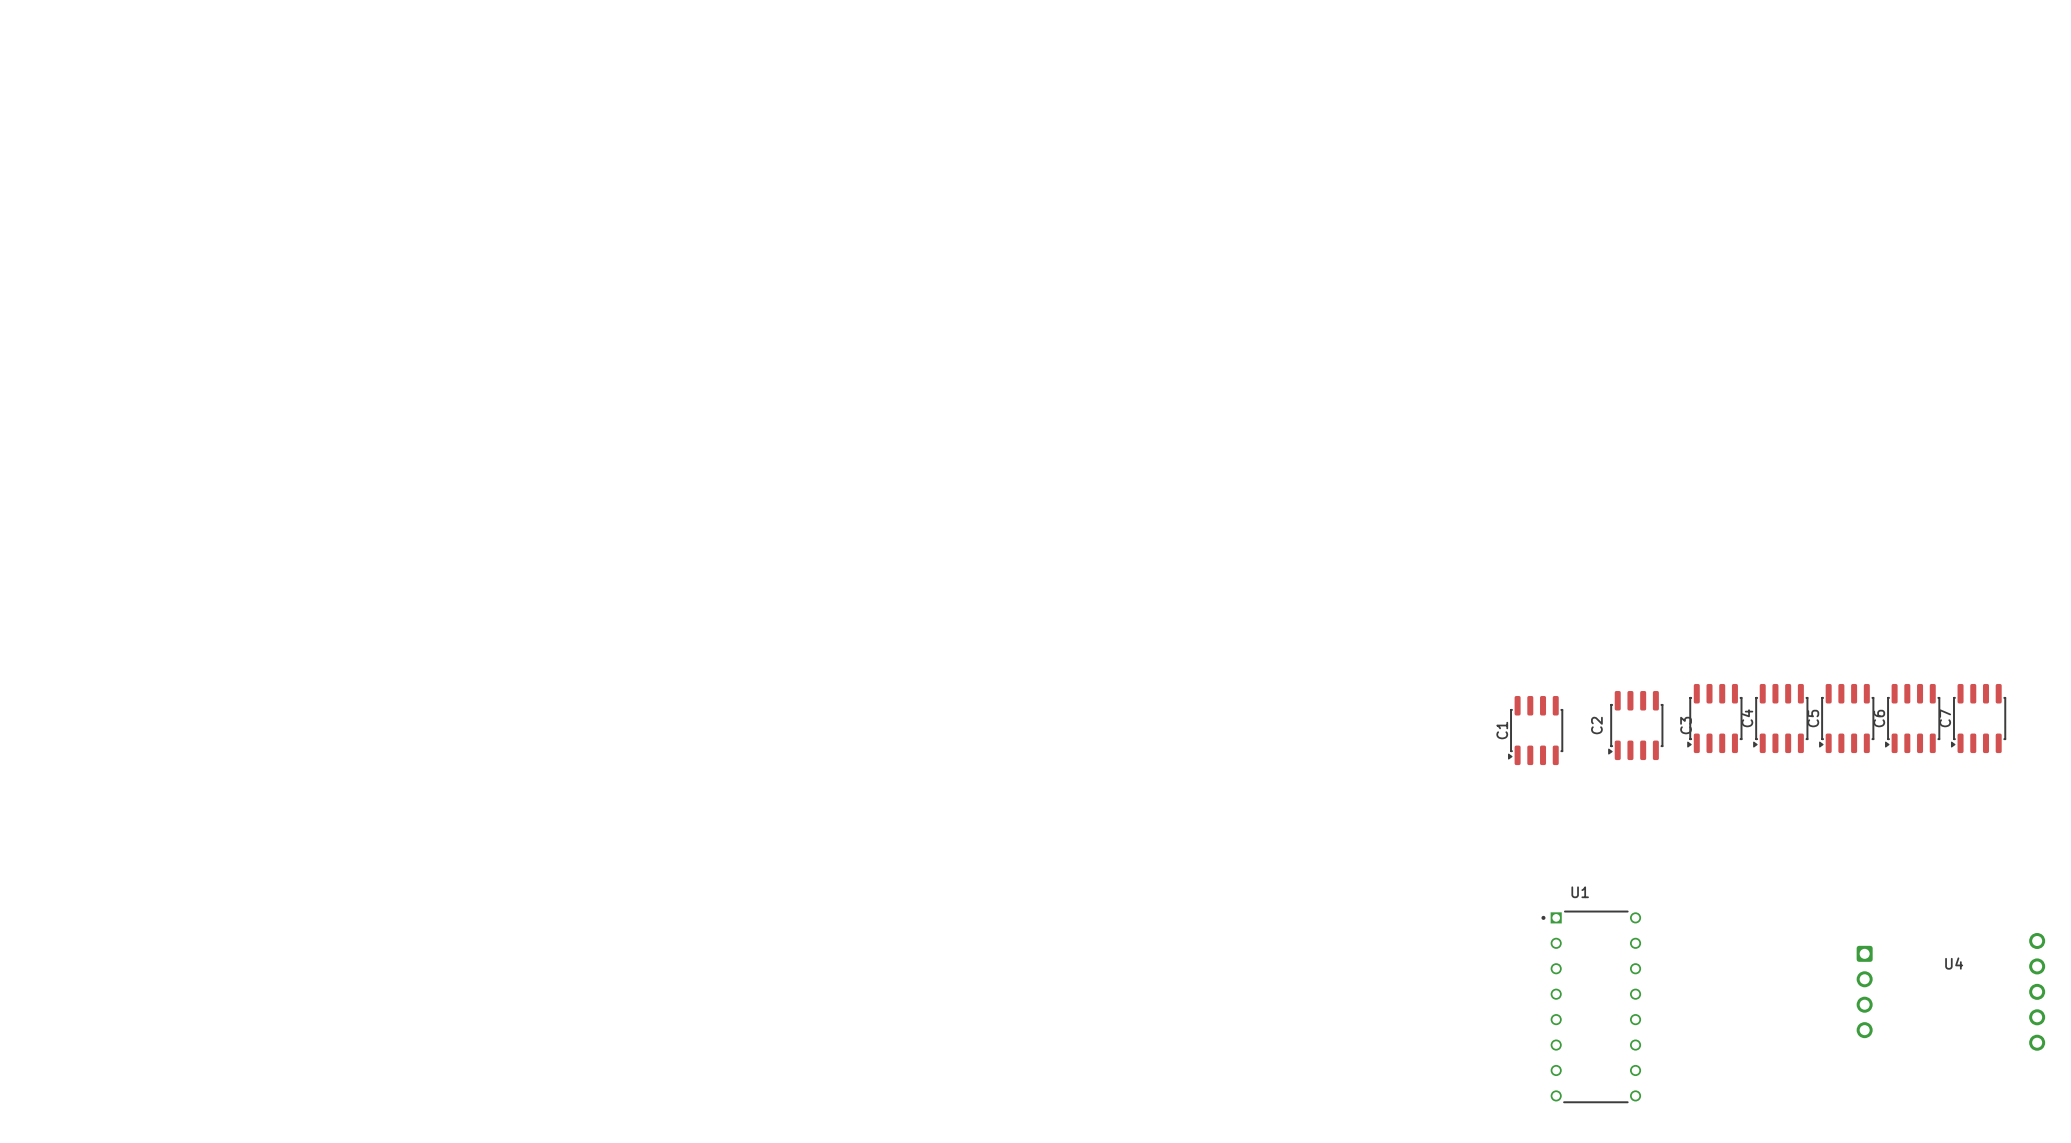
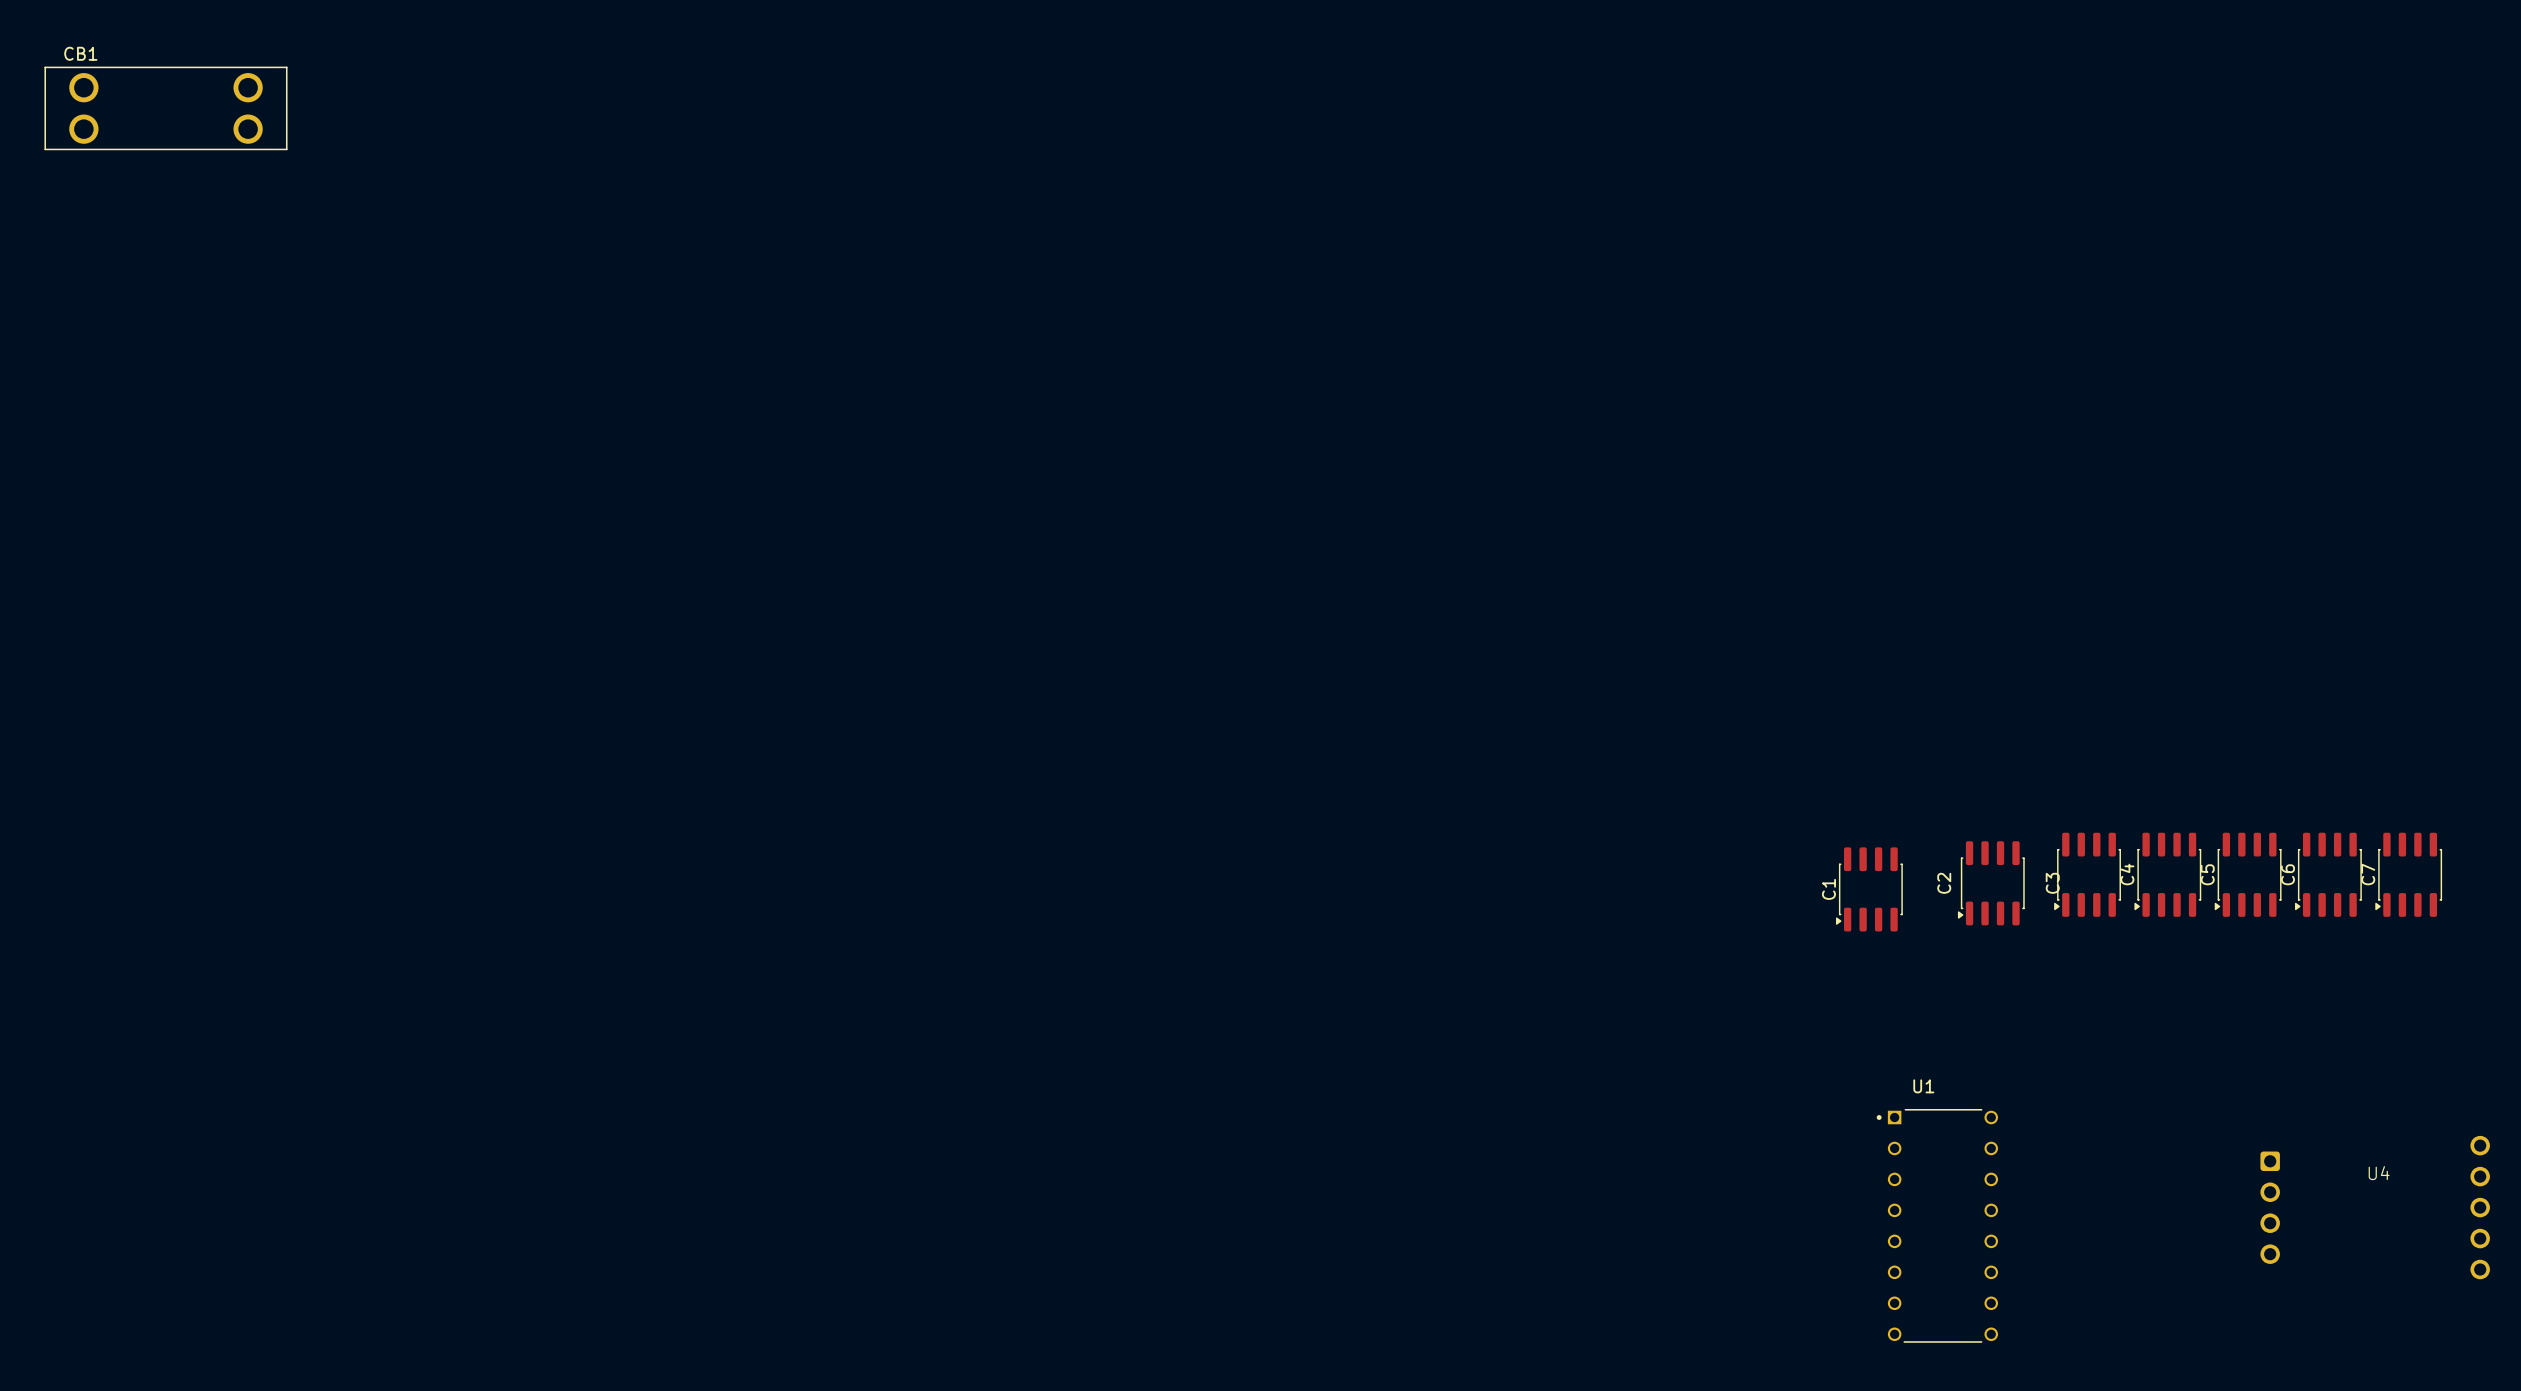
CB1: none -> (165, 108)

